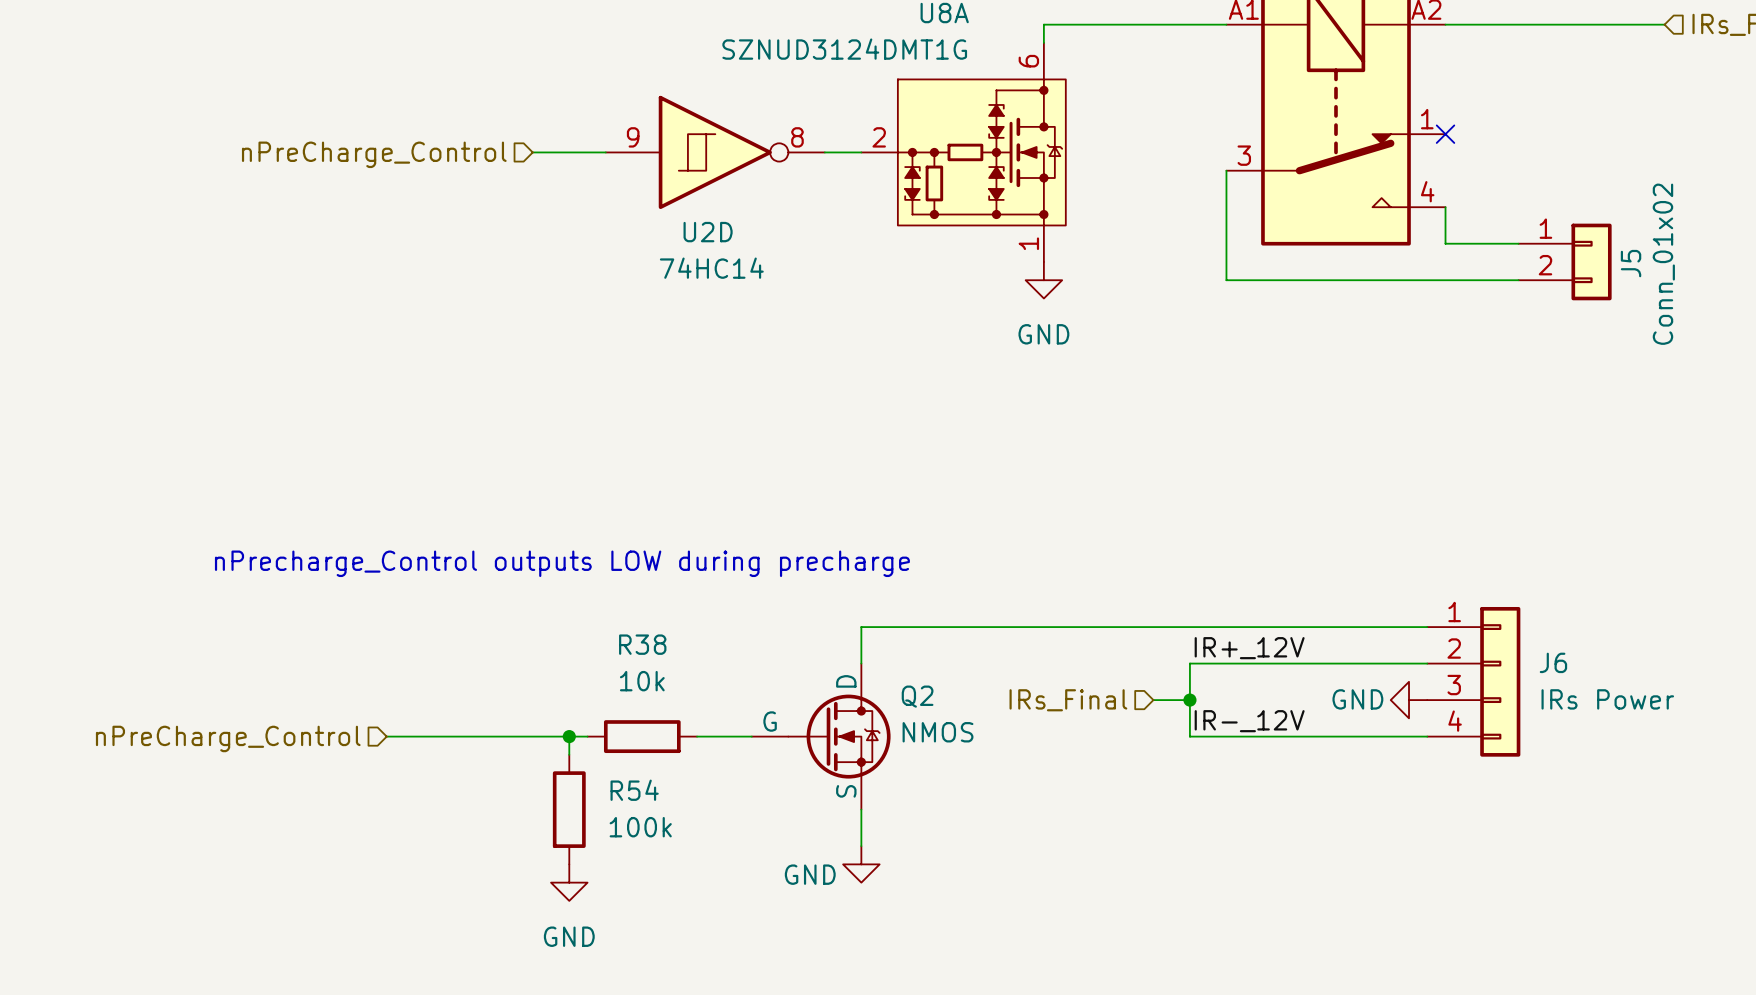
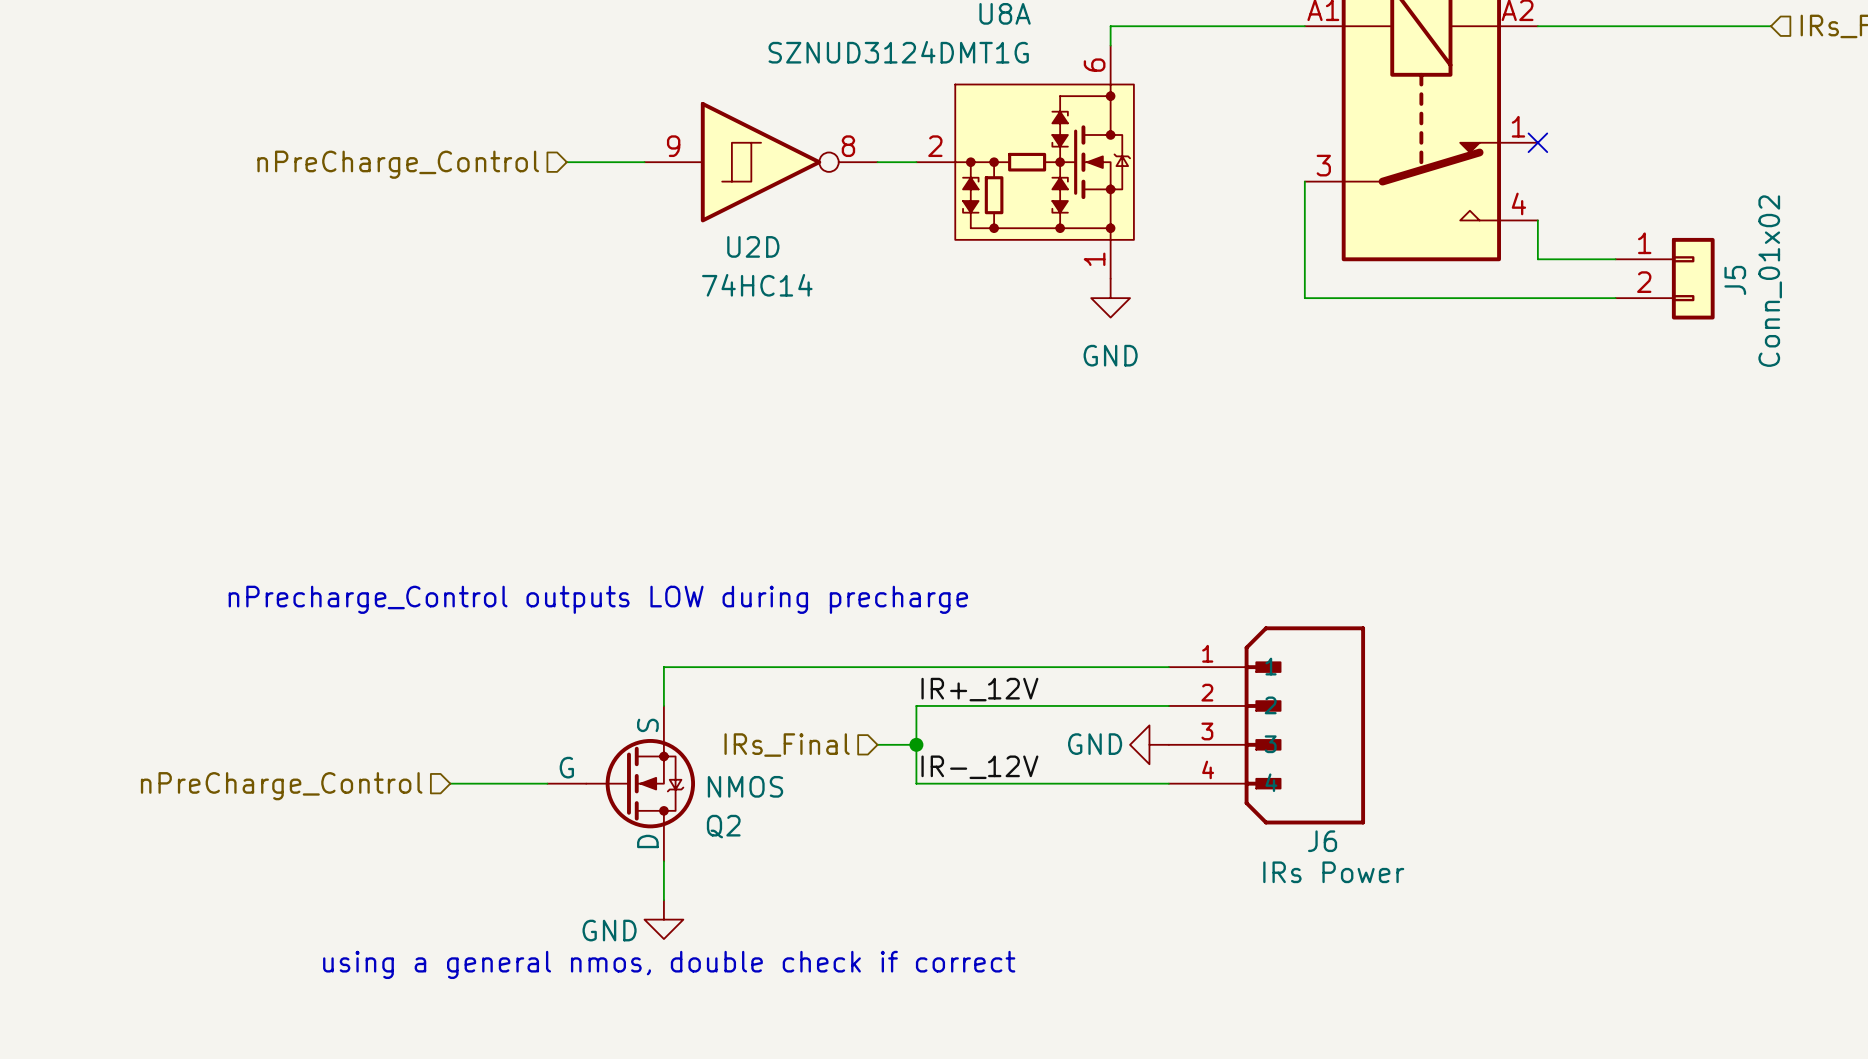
J6 symbol: [1427, 606, 1521, 757] -> [1168, 626, 1366, 825]
wire: (861, 627) (861, 663) -> (916, 667) (663, 667) (663, 705)
wire: (1098, 627) (1427, 627) -> none
label position: IR+_12V (1249, 648) -> IR+_12V (979, 689)
J6 name position: J6 (1553, 662) -> J6 (1322, 841)
wire: (1427, 663) (1189, 663) (1189, 736) (1427, 736) -> (1168, 705) (916, 705) (916, 783) (1168, 783)
J6 value position: IRs Power (1607, 699) -> IRs Power (1333, 872)
junction: none -> (916, 744)
hierarchical label position: IRs_Final (1068, 700) -> IRs_Final (787, 745)
power symbol: none -> GND (1149, 744)
junction: (1189, 700) -> none
power symbol: GND (1409, 700) -> none
label position: IR-_12V (1249, 721) -> IR-_12V (979, 767)
wire: (386, 736) (423, 736) -> none
wire: (569, 736) (569, 754) -> none
junction: (569, 736) -> none
R38: 10k (642, 736) -> none
wire: (697, 736) (751, 736) -> none
Q2 position: (821, 736) -> (621, 783)
Q2 flip: as is (839, 736) -> up-down (640, 783)
hierarchical label position: nPreCharge_Control (228, 738) -> nPreCharge_Control (281, 786)
R54: 100k (569, 809) -> none
wire: (861, 809) (861, 846) -> (663, 861) (663, 900)
power symbol: GND (861, 864) -> none
power symbol position: GND (569, 882) -> GND (663, 919)
text: none -> using a general nmos, double check if correct (669, 964)
power symbol text position: GND (569, 936) -> GND (609, 930)

